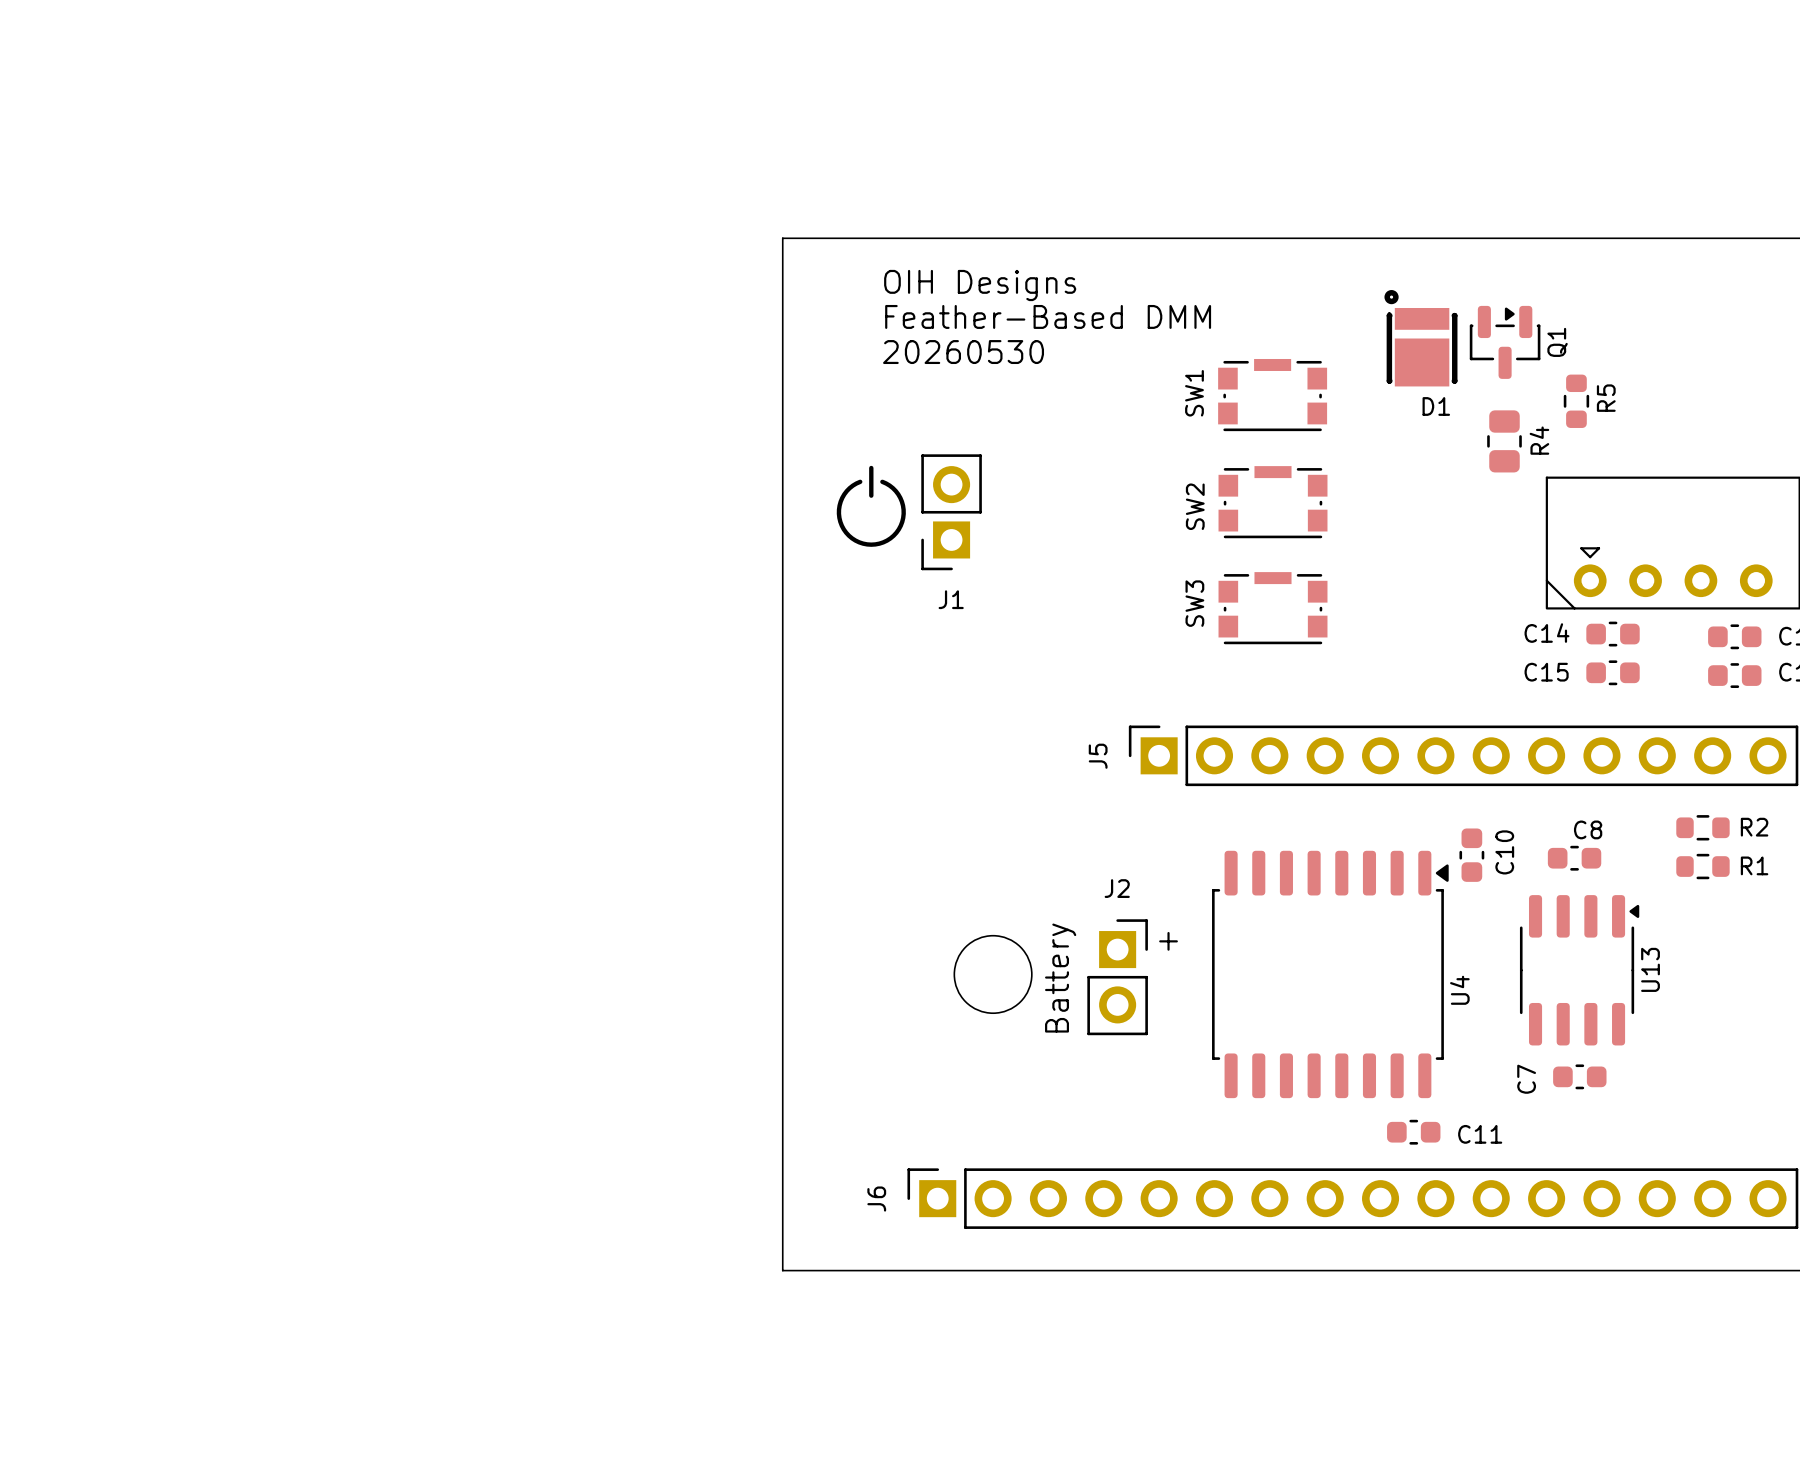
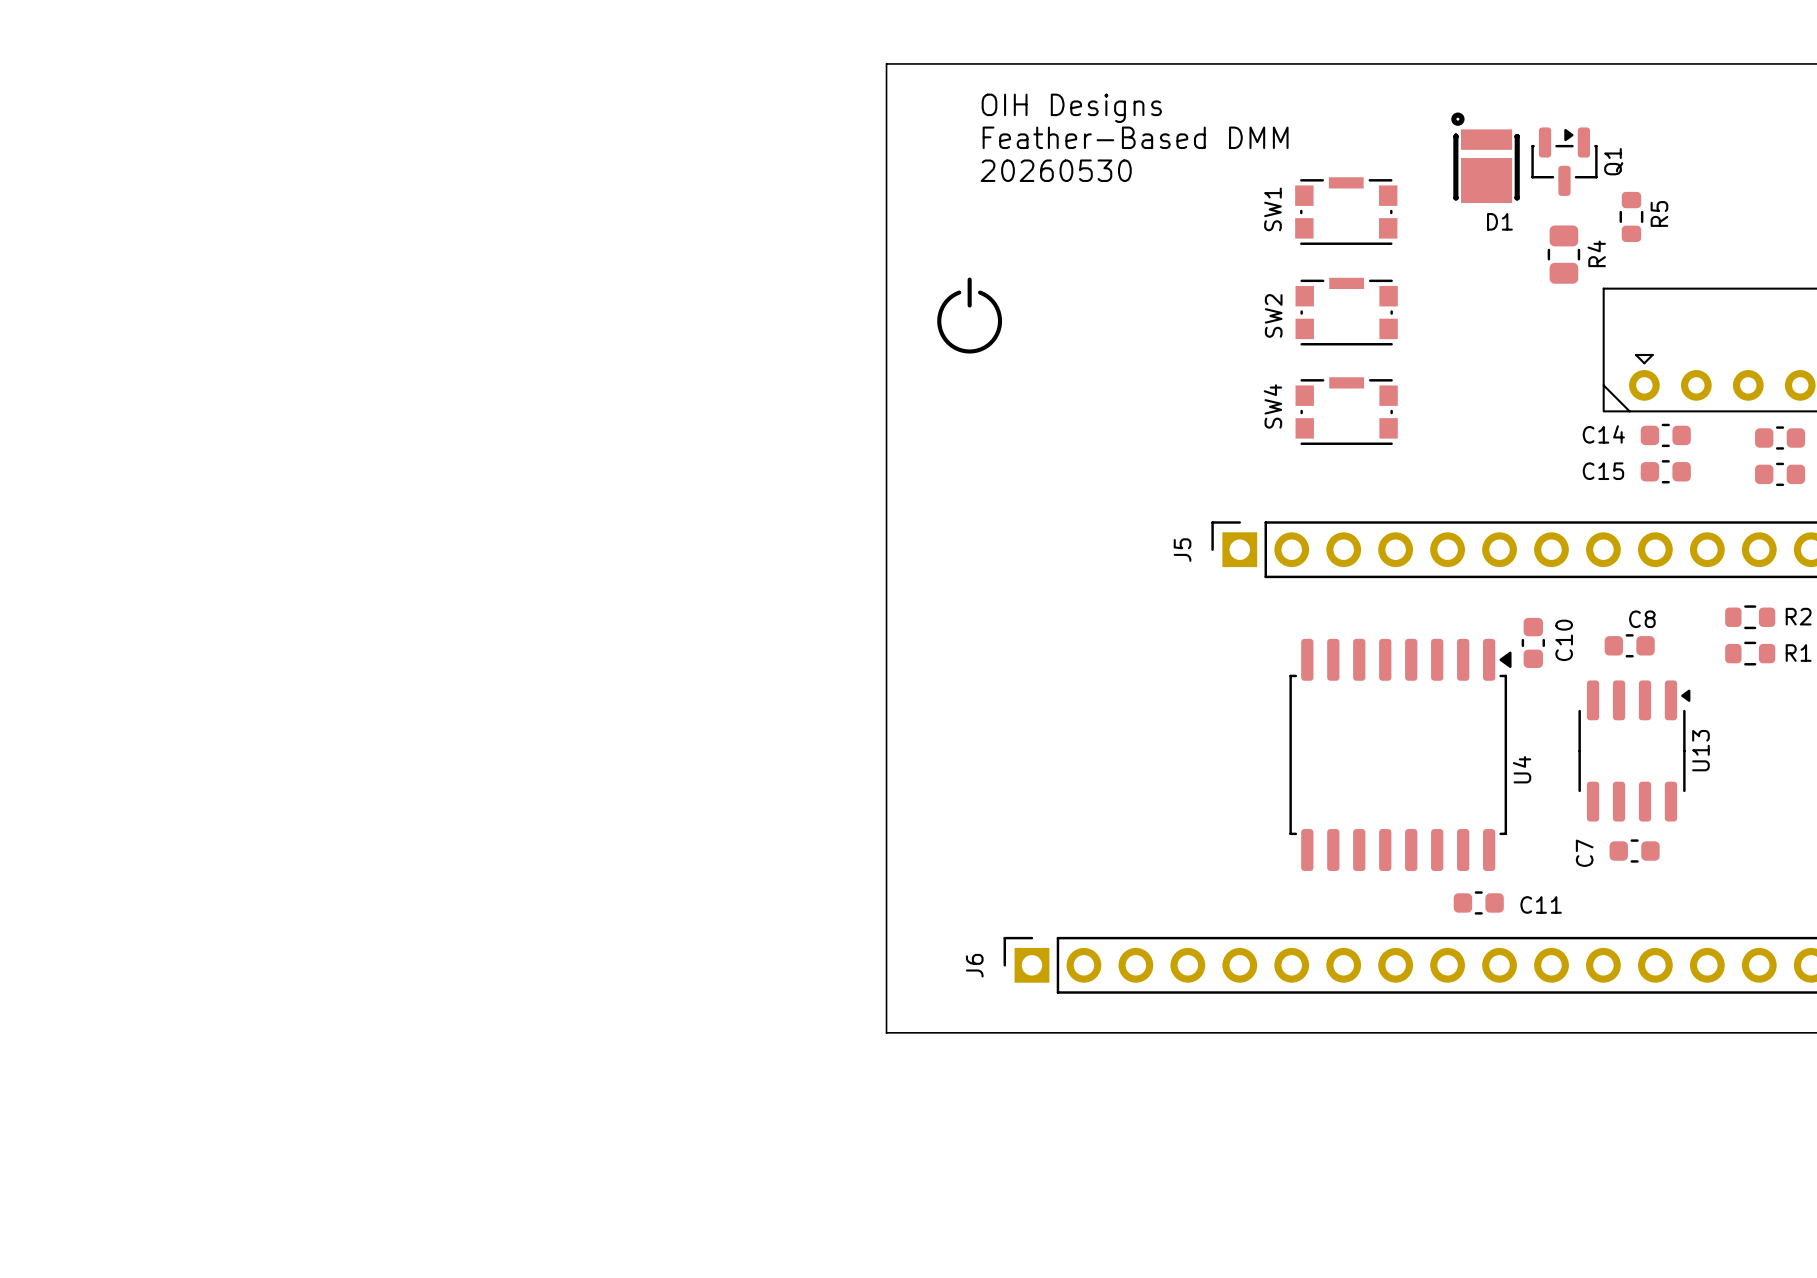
J1: (951, 512) -> none
SW3 name: SW3 (1194, 603) -> SW4 (1272, 406)
round board edge: [953, 935, 1033, 1014] -> none
text: + (1168, 941) -> none
J2: (1117, 977) -> none
text: Battery (1060, 978) -> none

